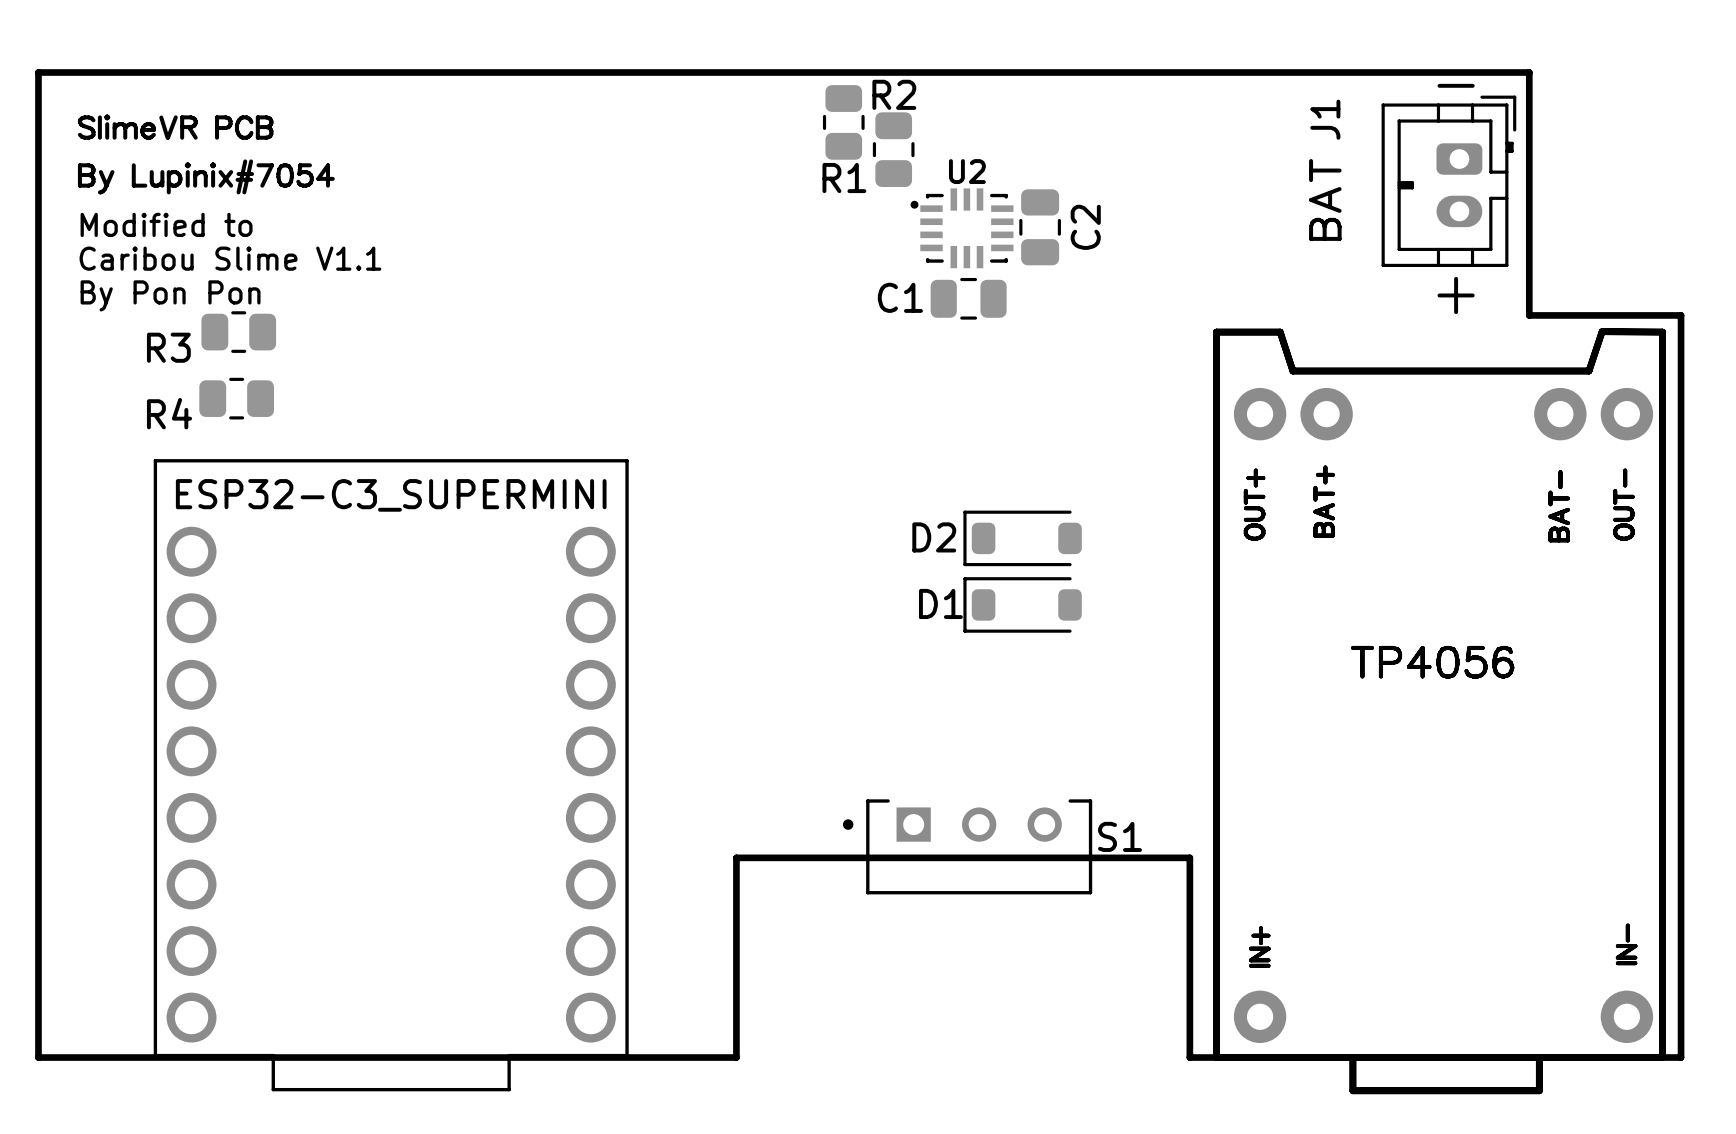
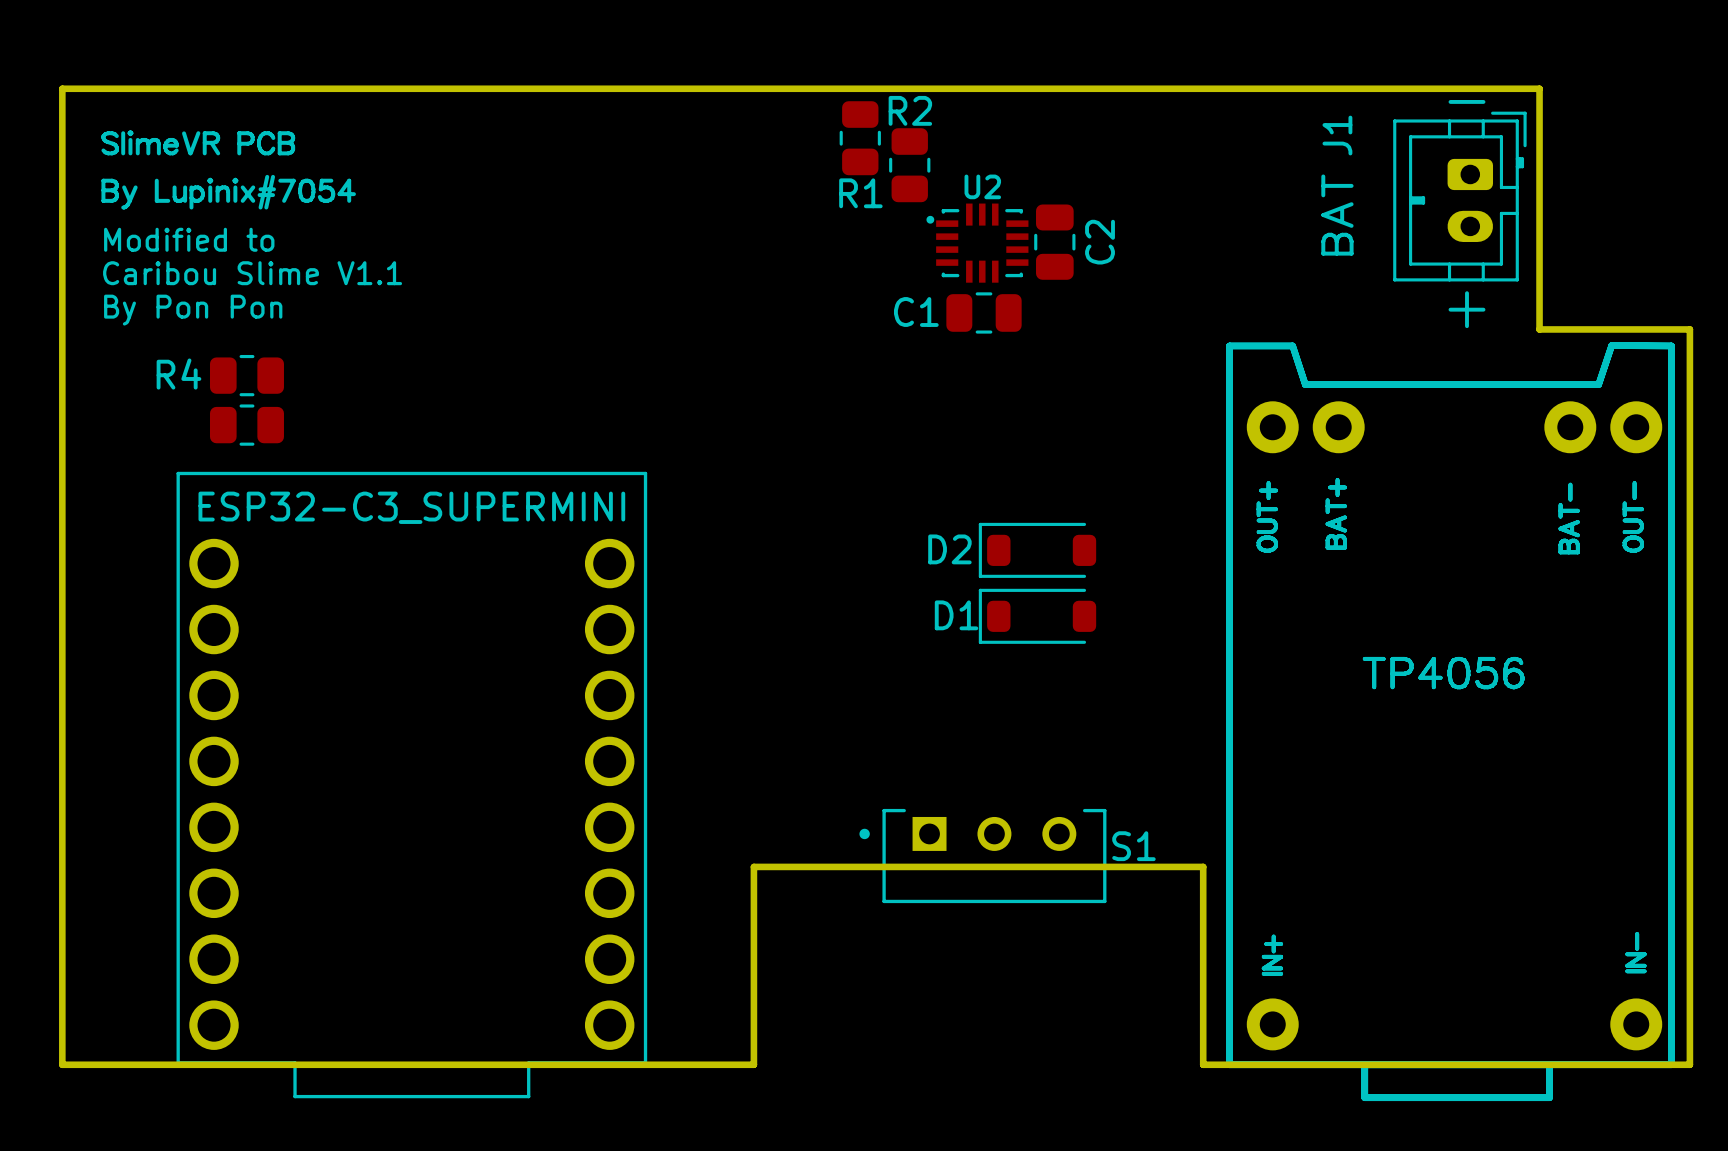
R3: (238, 332) -> none
R4 position: (236, 398) -> (246, 375)
part: none -> (246, 425)
R4 name position: R4 (169, 413) -> R4 (178, 374)

